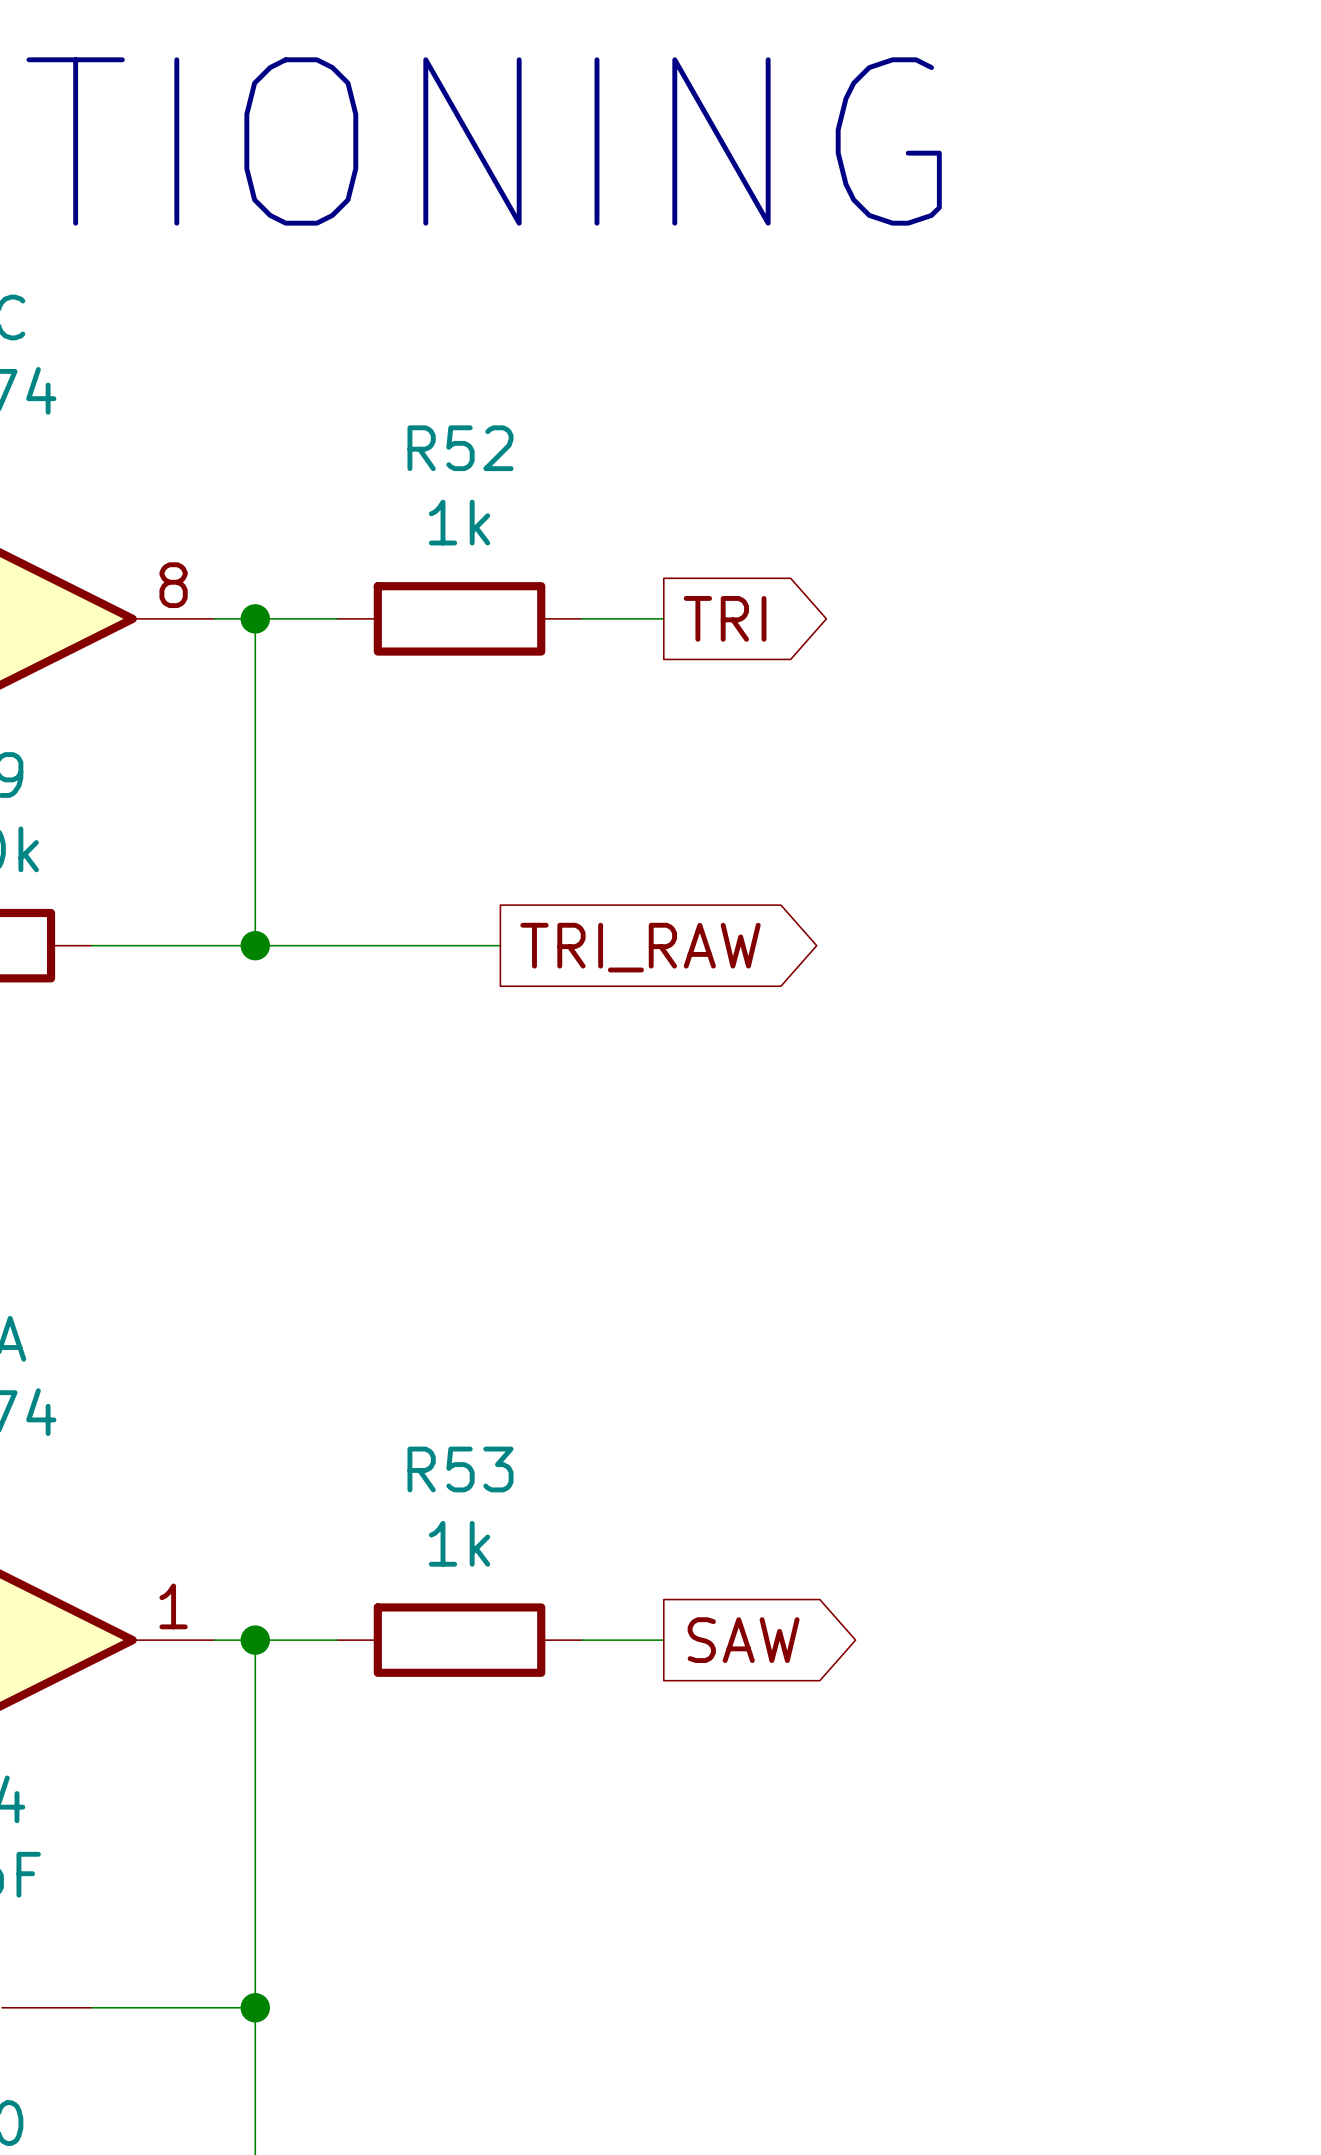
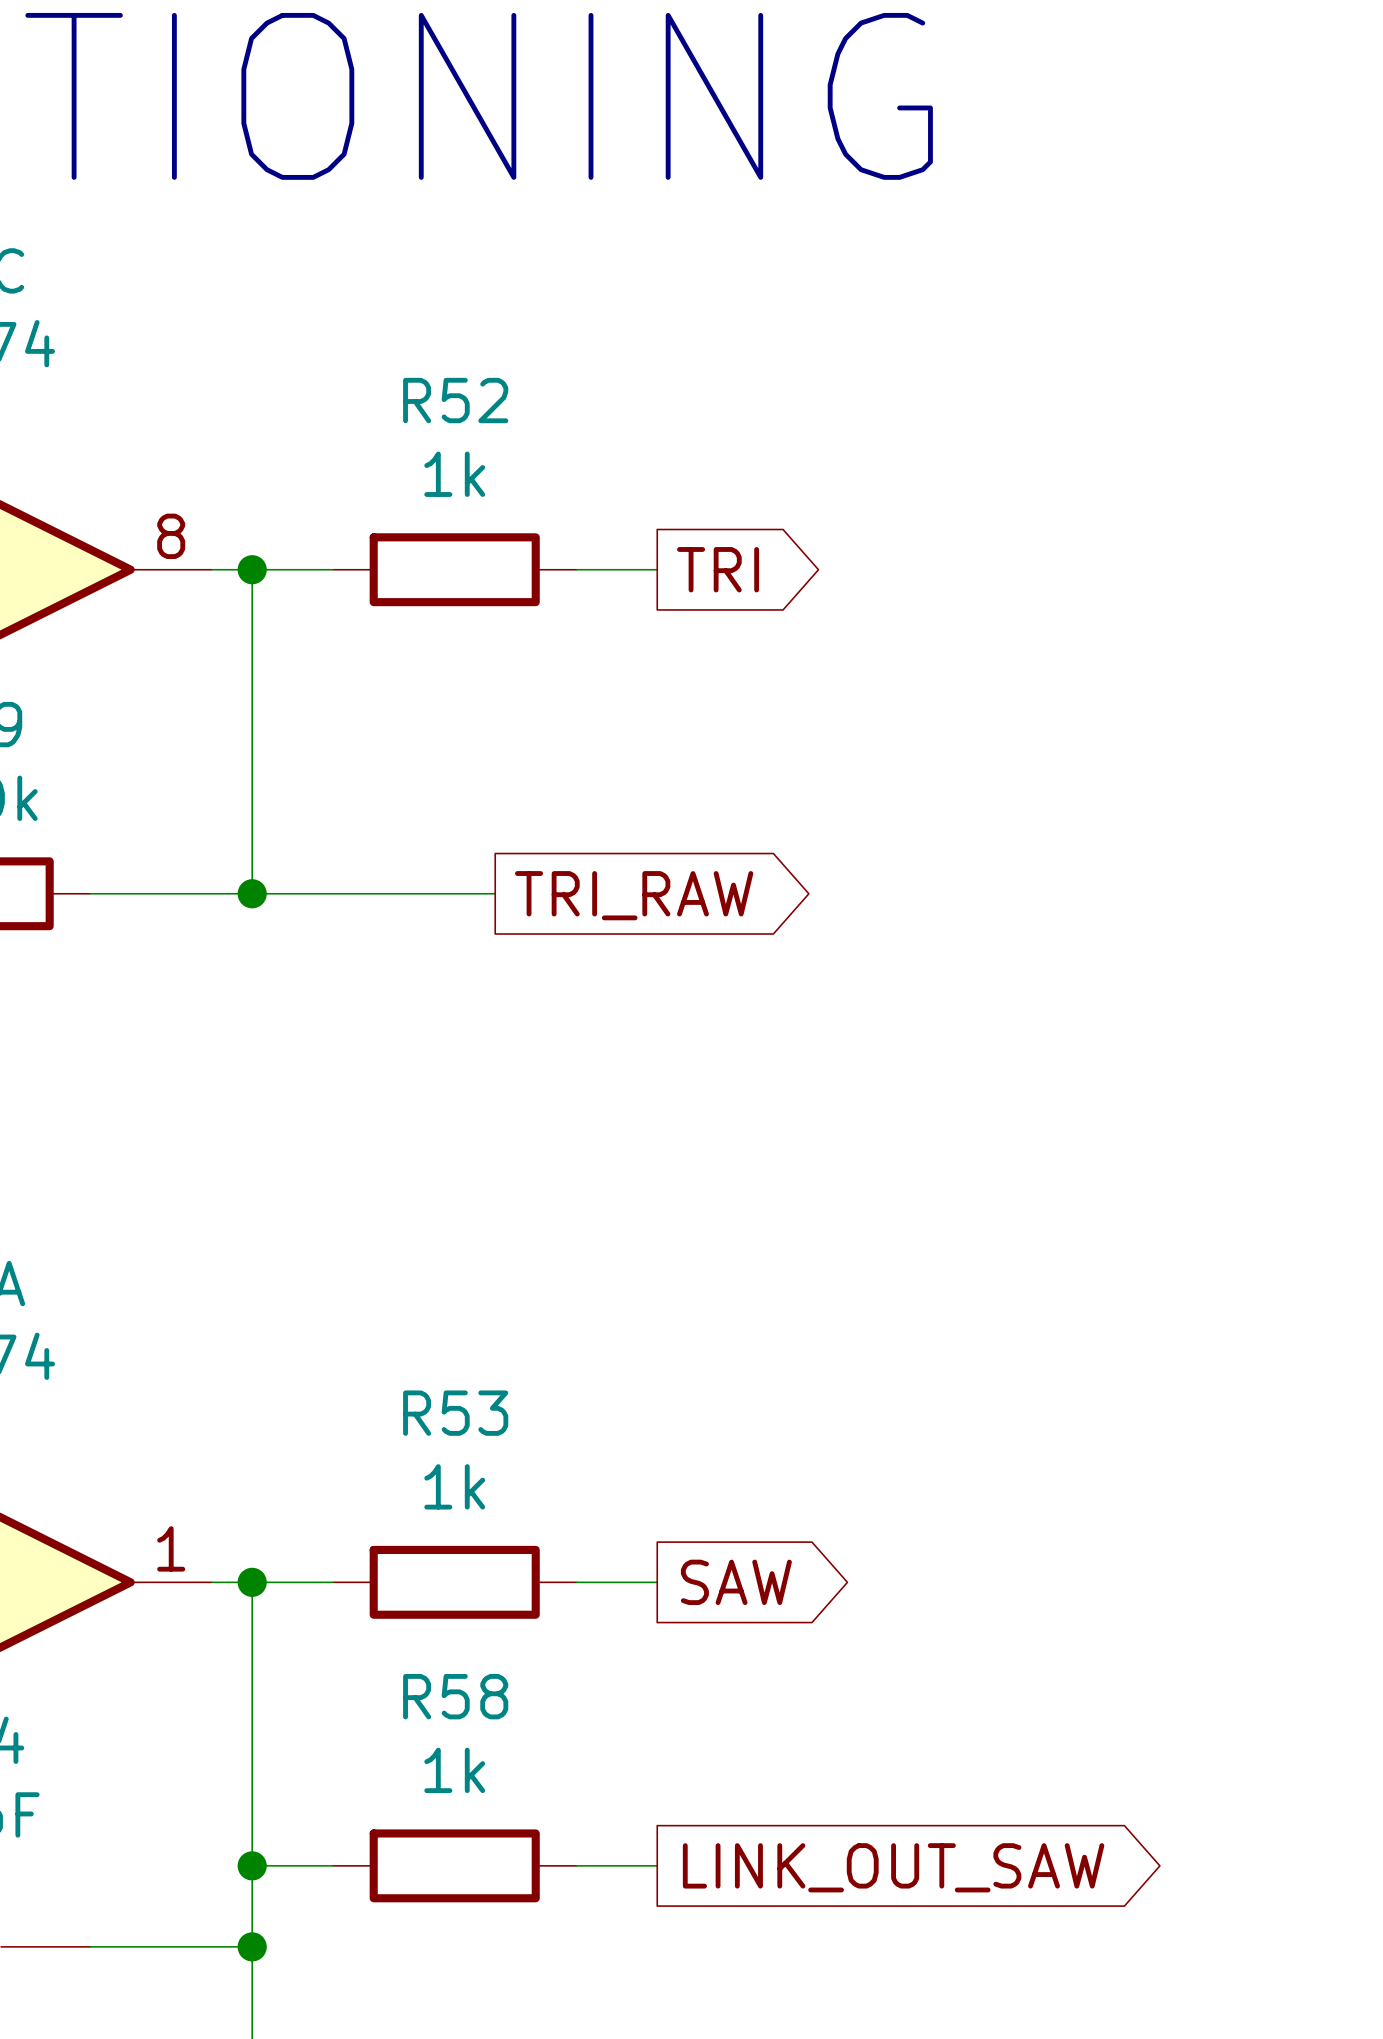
wire: none -> (252, 1865) (333, 1865)
junction: none -> (252, 1865)
R58: none -> 1k (454, 1865)
wire: none -> (576, 1865) (657, 1865)
global label: none -> LINK_OUT_SAW (893, 1867)

